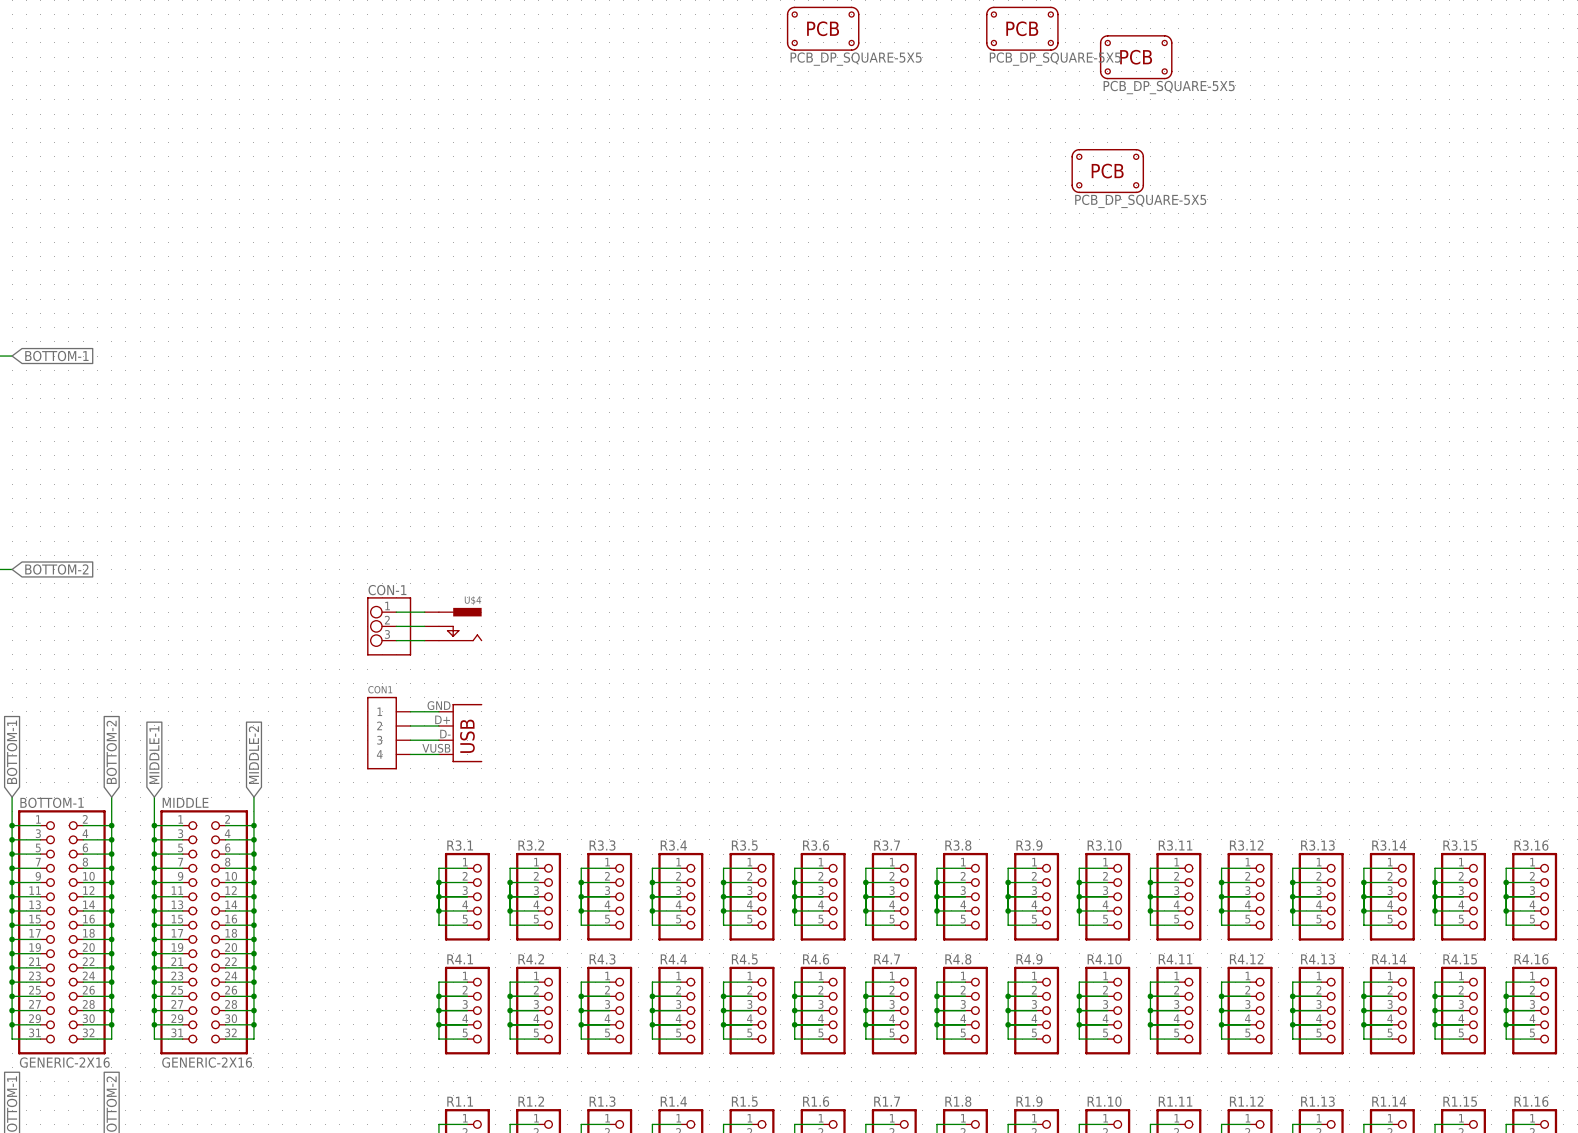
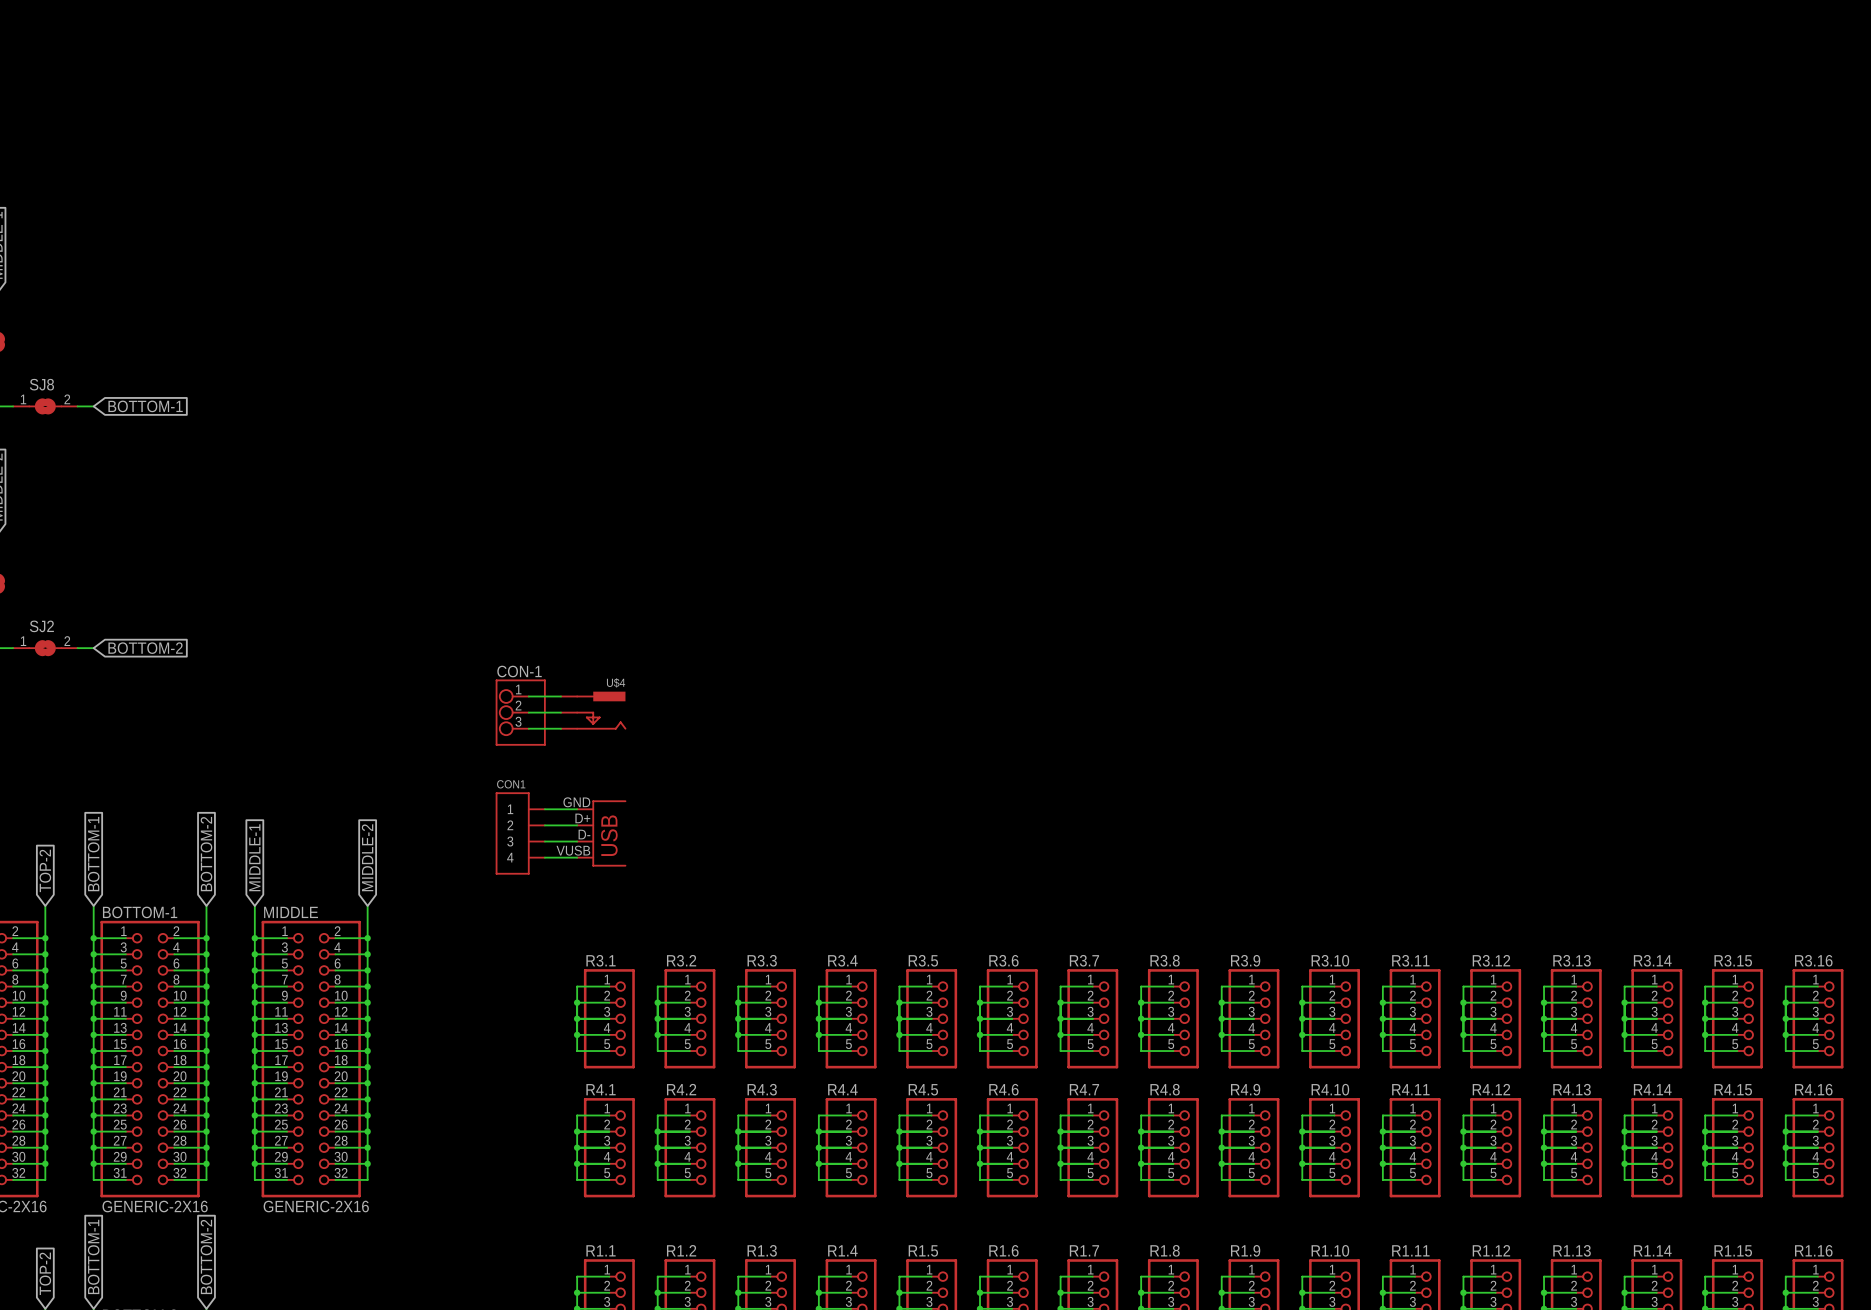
part: PCB_DP_SQUARE-5X5 (823, 28) -> none
part: PCB_DP_SQUARE-5X5 (1022, 28) -> none
part: PCB_DP_SQUARE-5X5 (1136, 57) -> none
part: PCB_DP_SQUARE-5X5 (1107, 171) -> none

